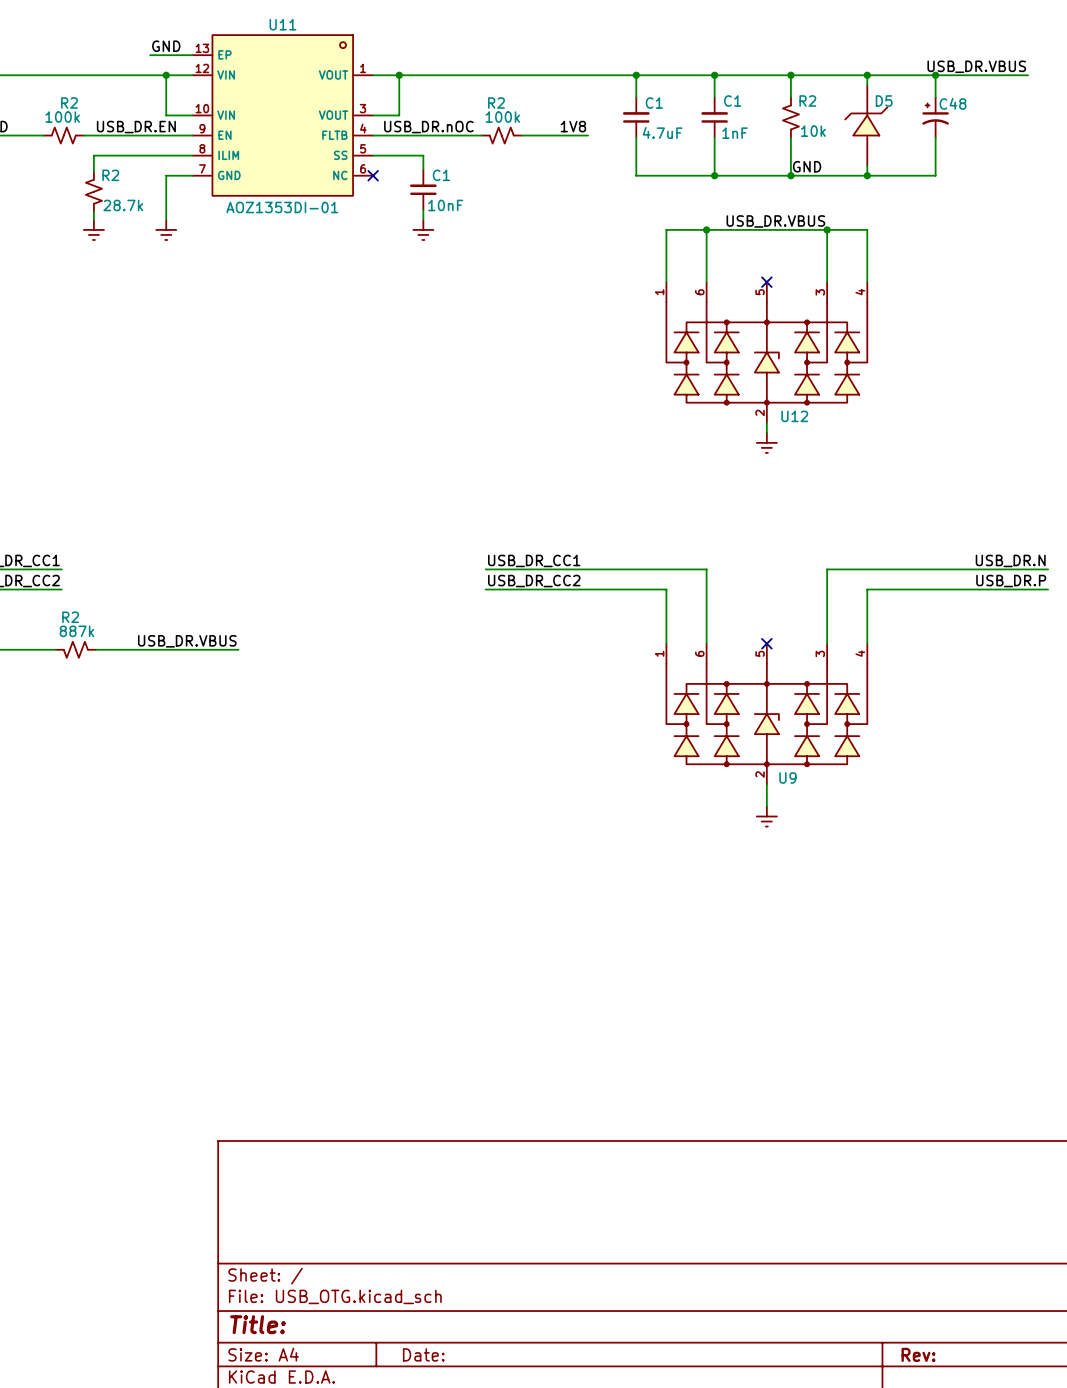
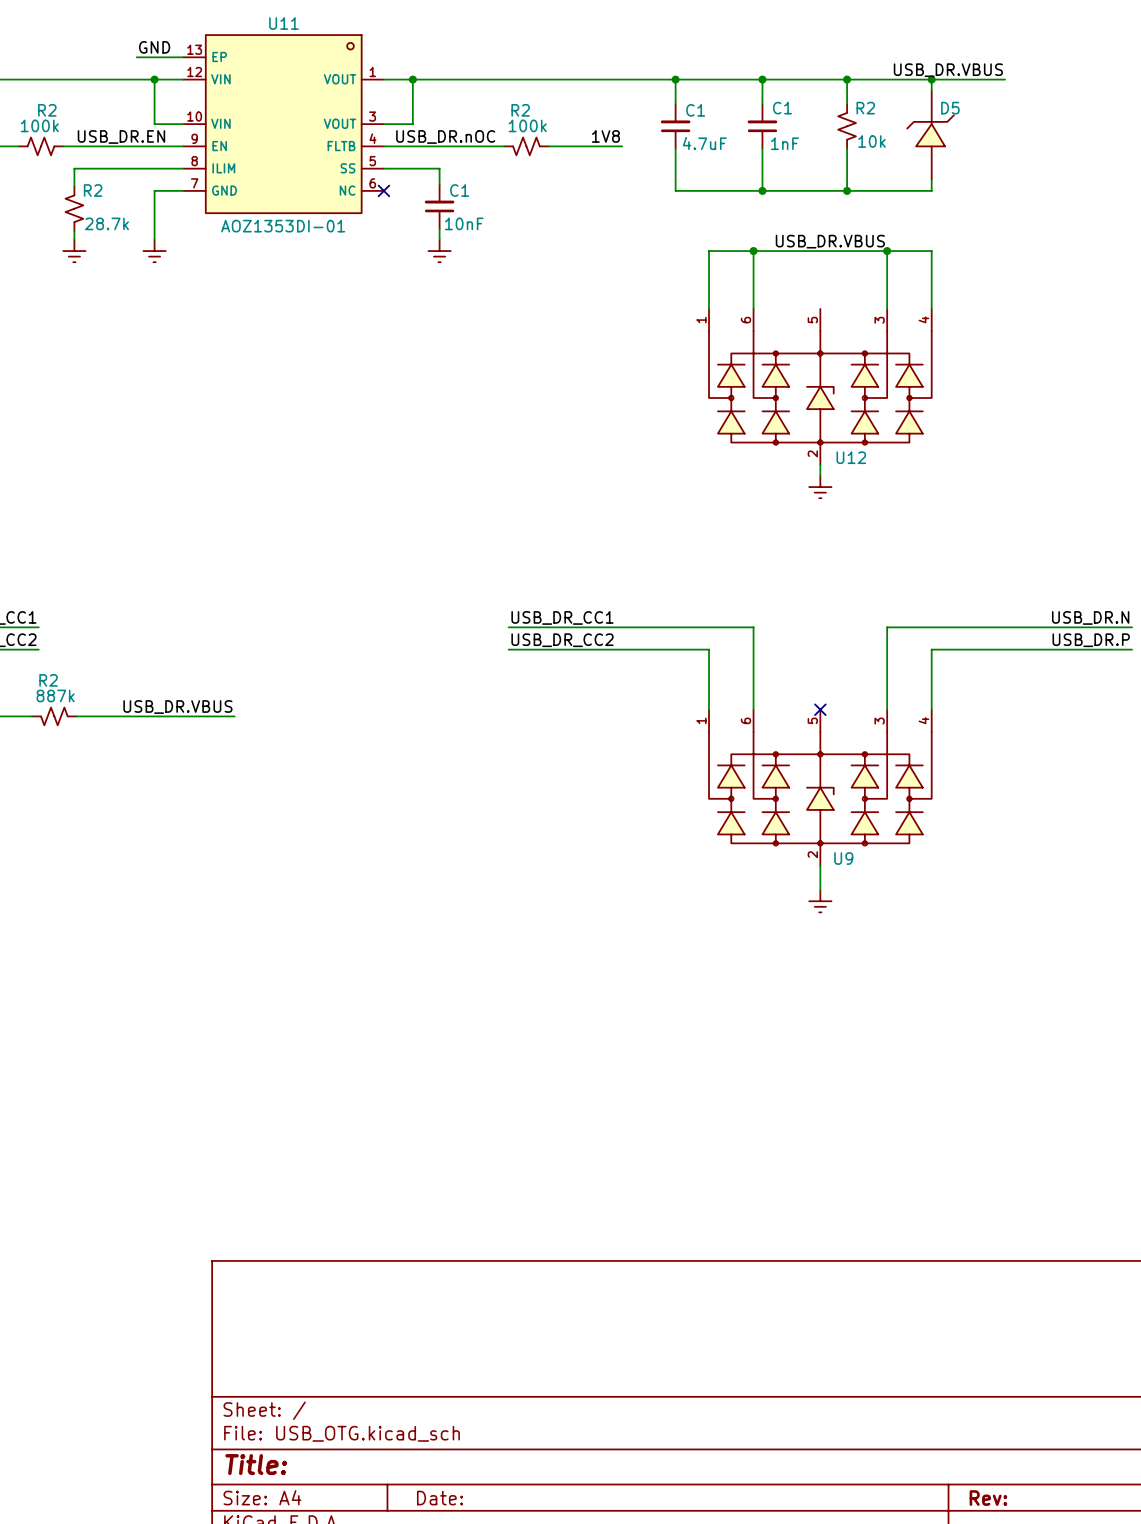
label position: USB_DR.VBUS (976, 66) -> USB_DR.VBUS (948, 70)
wire: (933, 75) (1028, 75) -> none
wire: (935, 75) (935, 97) -> none
junction: (935, 75) -> none
C48: (935, 117) -> none
wire: (935, 137) (935, 175) (867, 175) -> none
label: GND (807, 166) -> none
junction: (867, 175) -> none
no-connect mark: (766, 282) -> none

